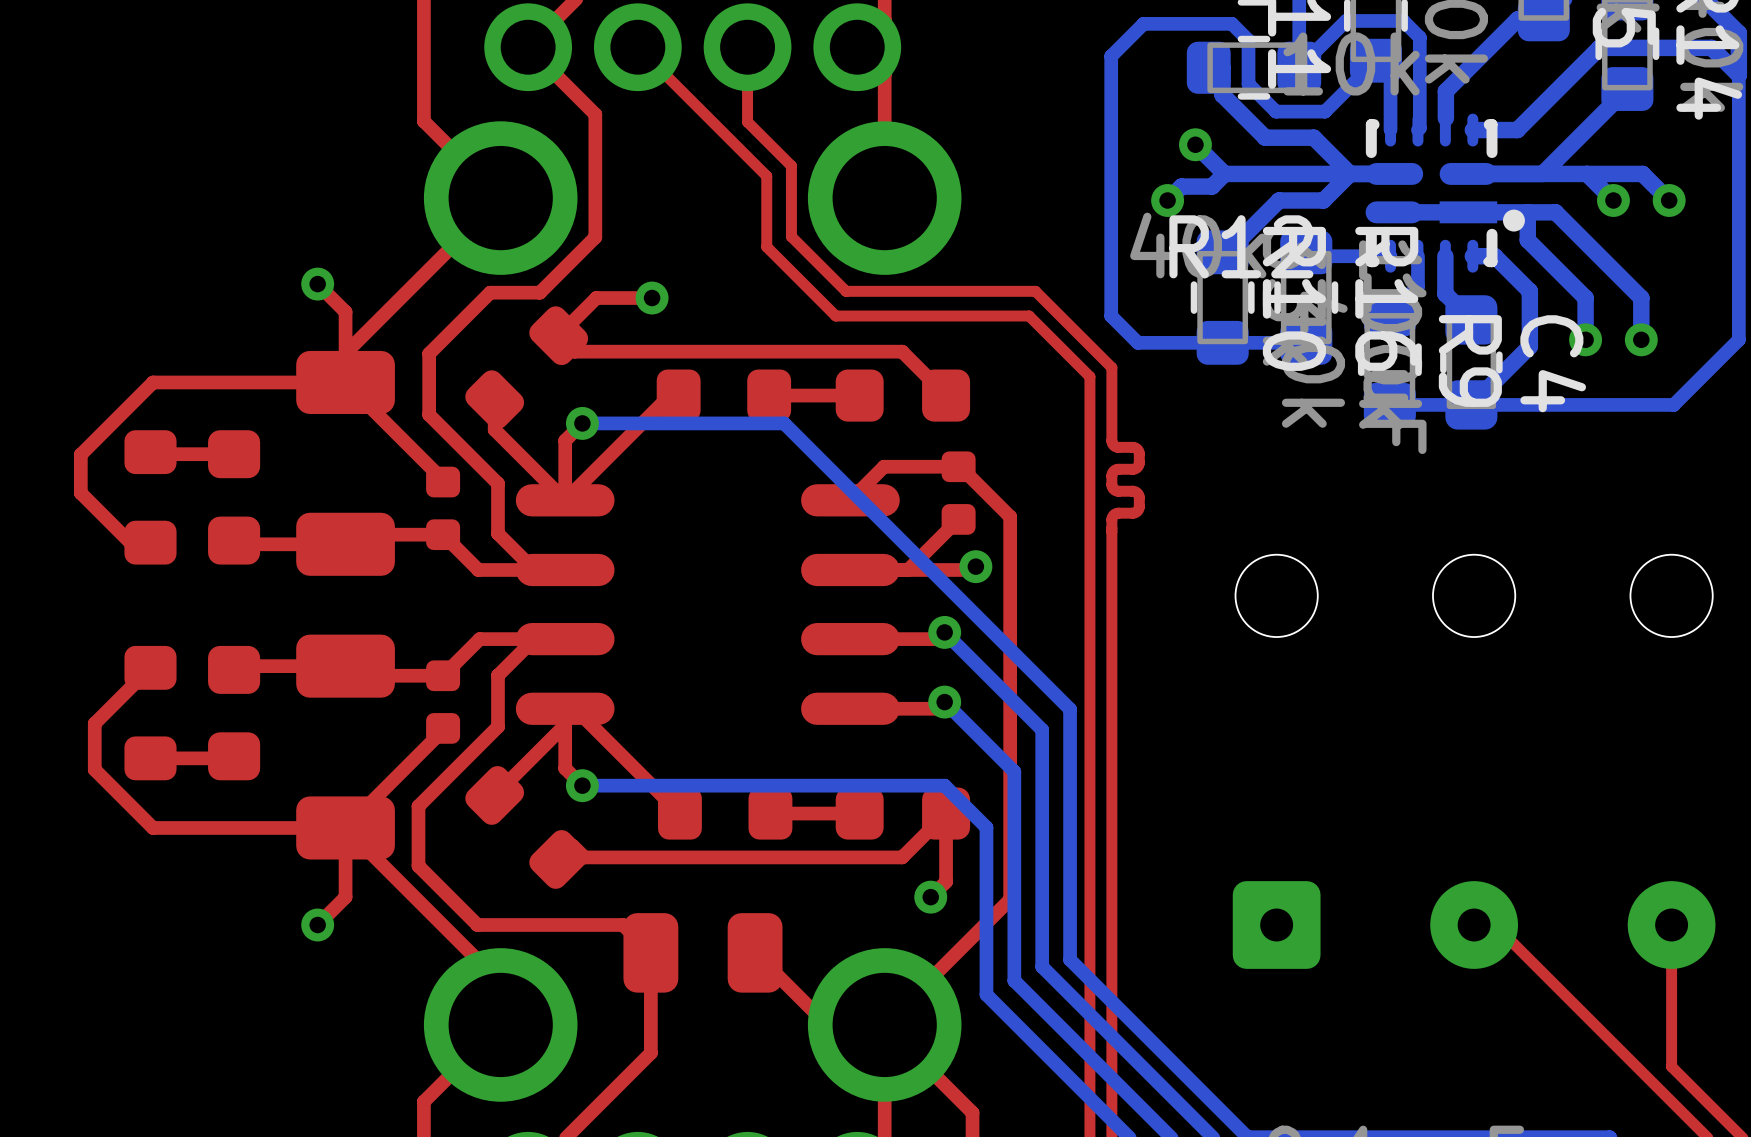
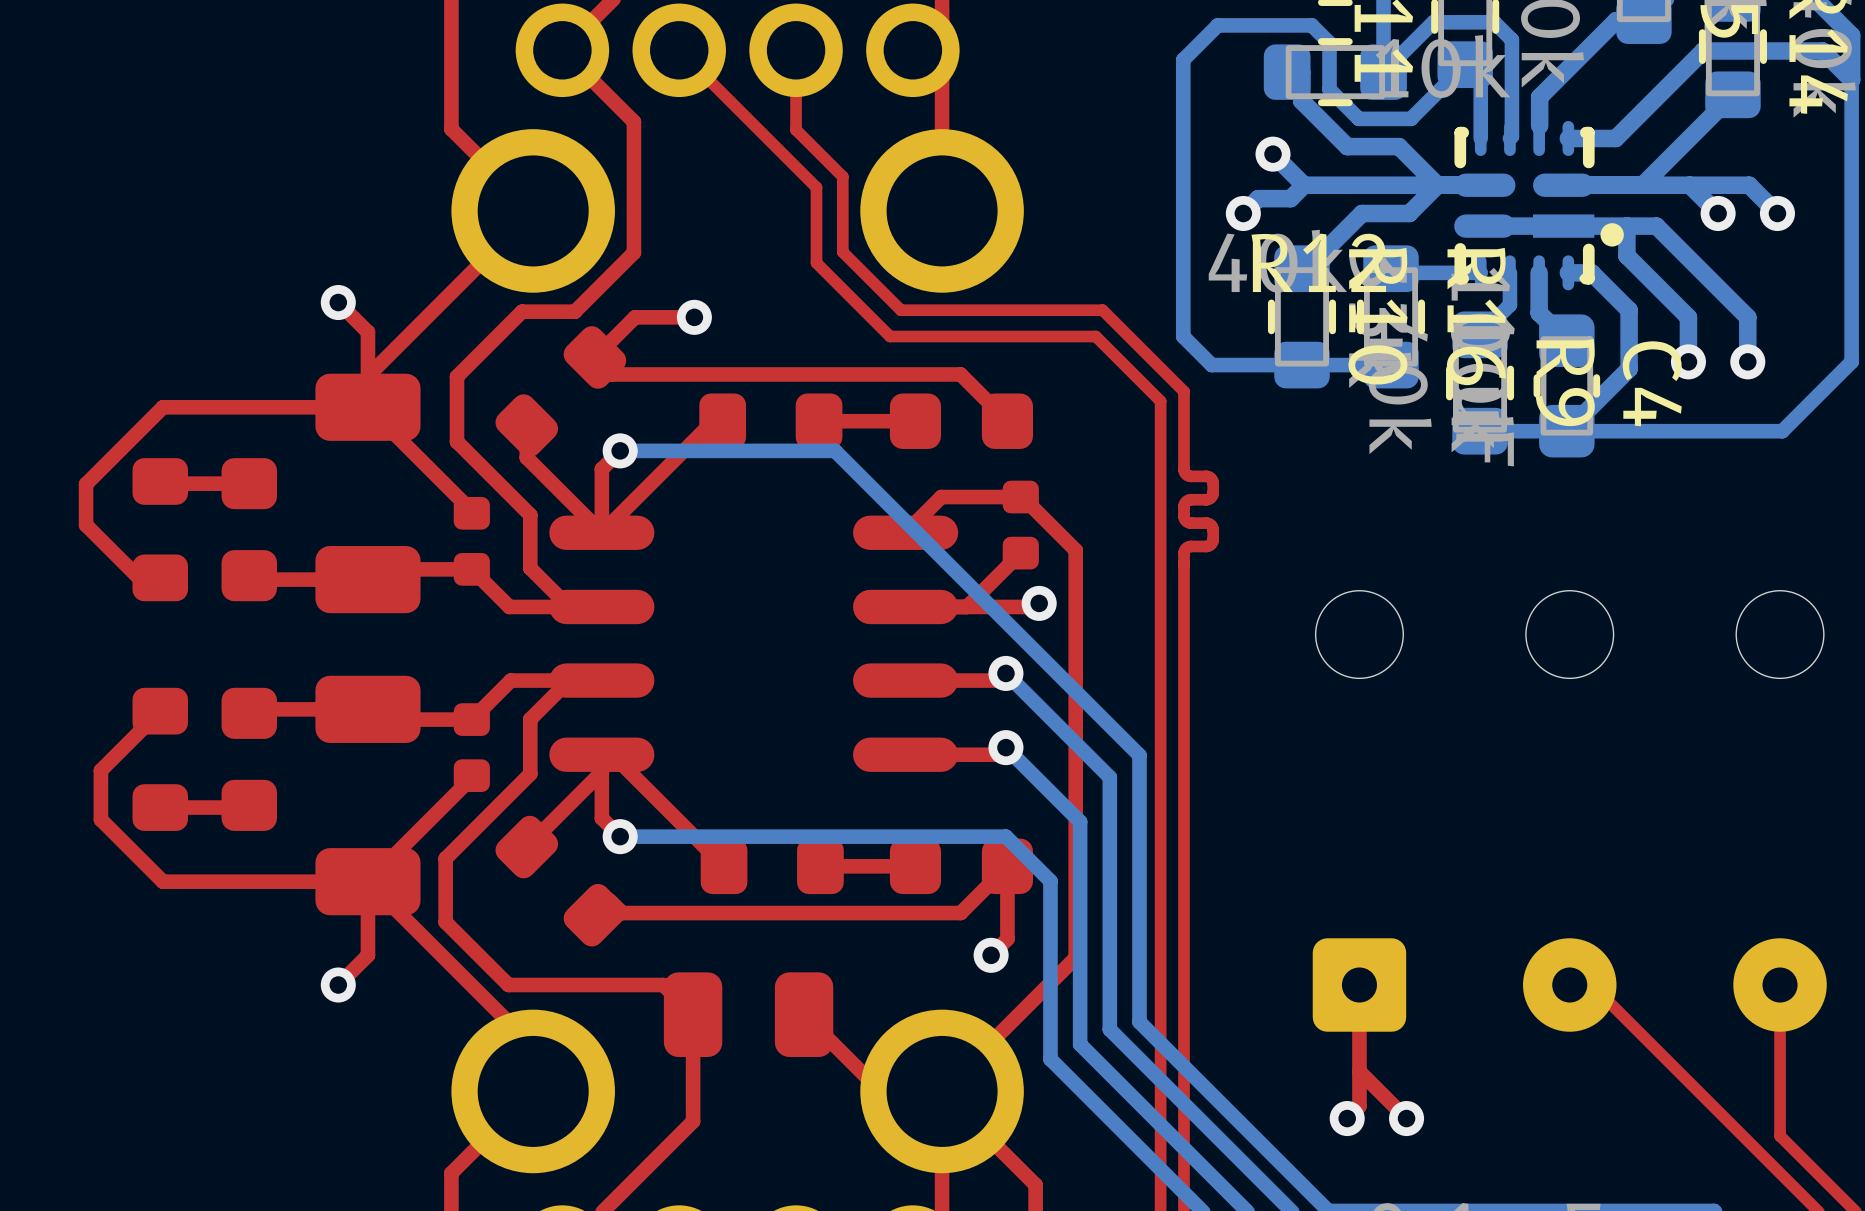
top track: none -> (1359, 985) (1359, 1106) (1347, 1118)
top track: none -> (1359, 1071) (1406, 1118)
via: none -> (1347, 1118)
via: none -> (1406, 1118)

